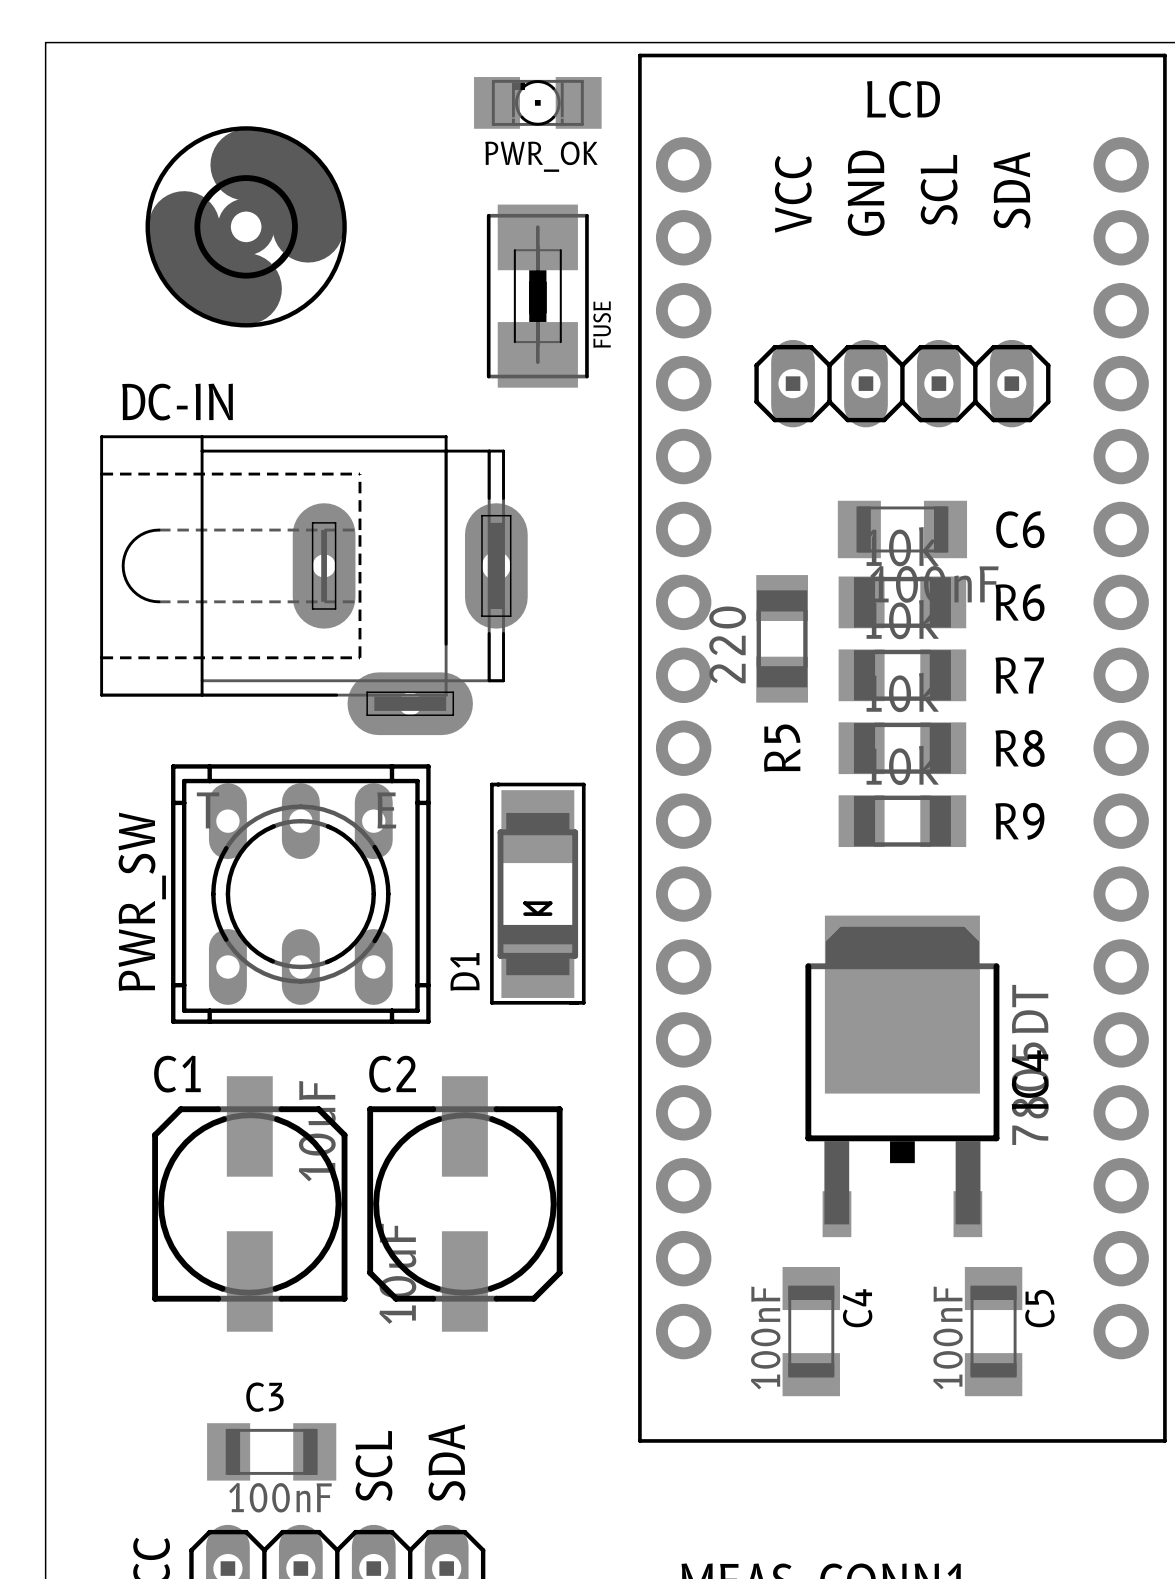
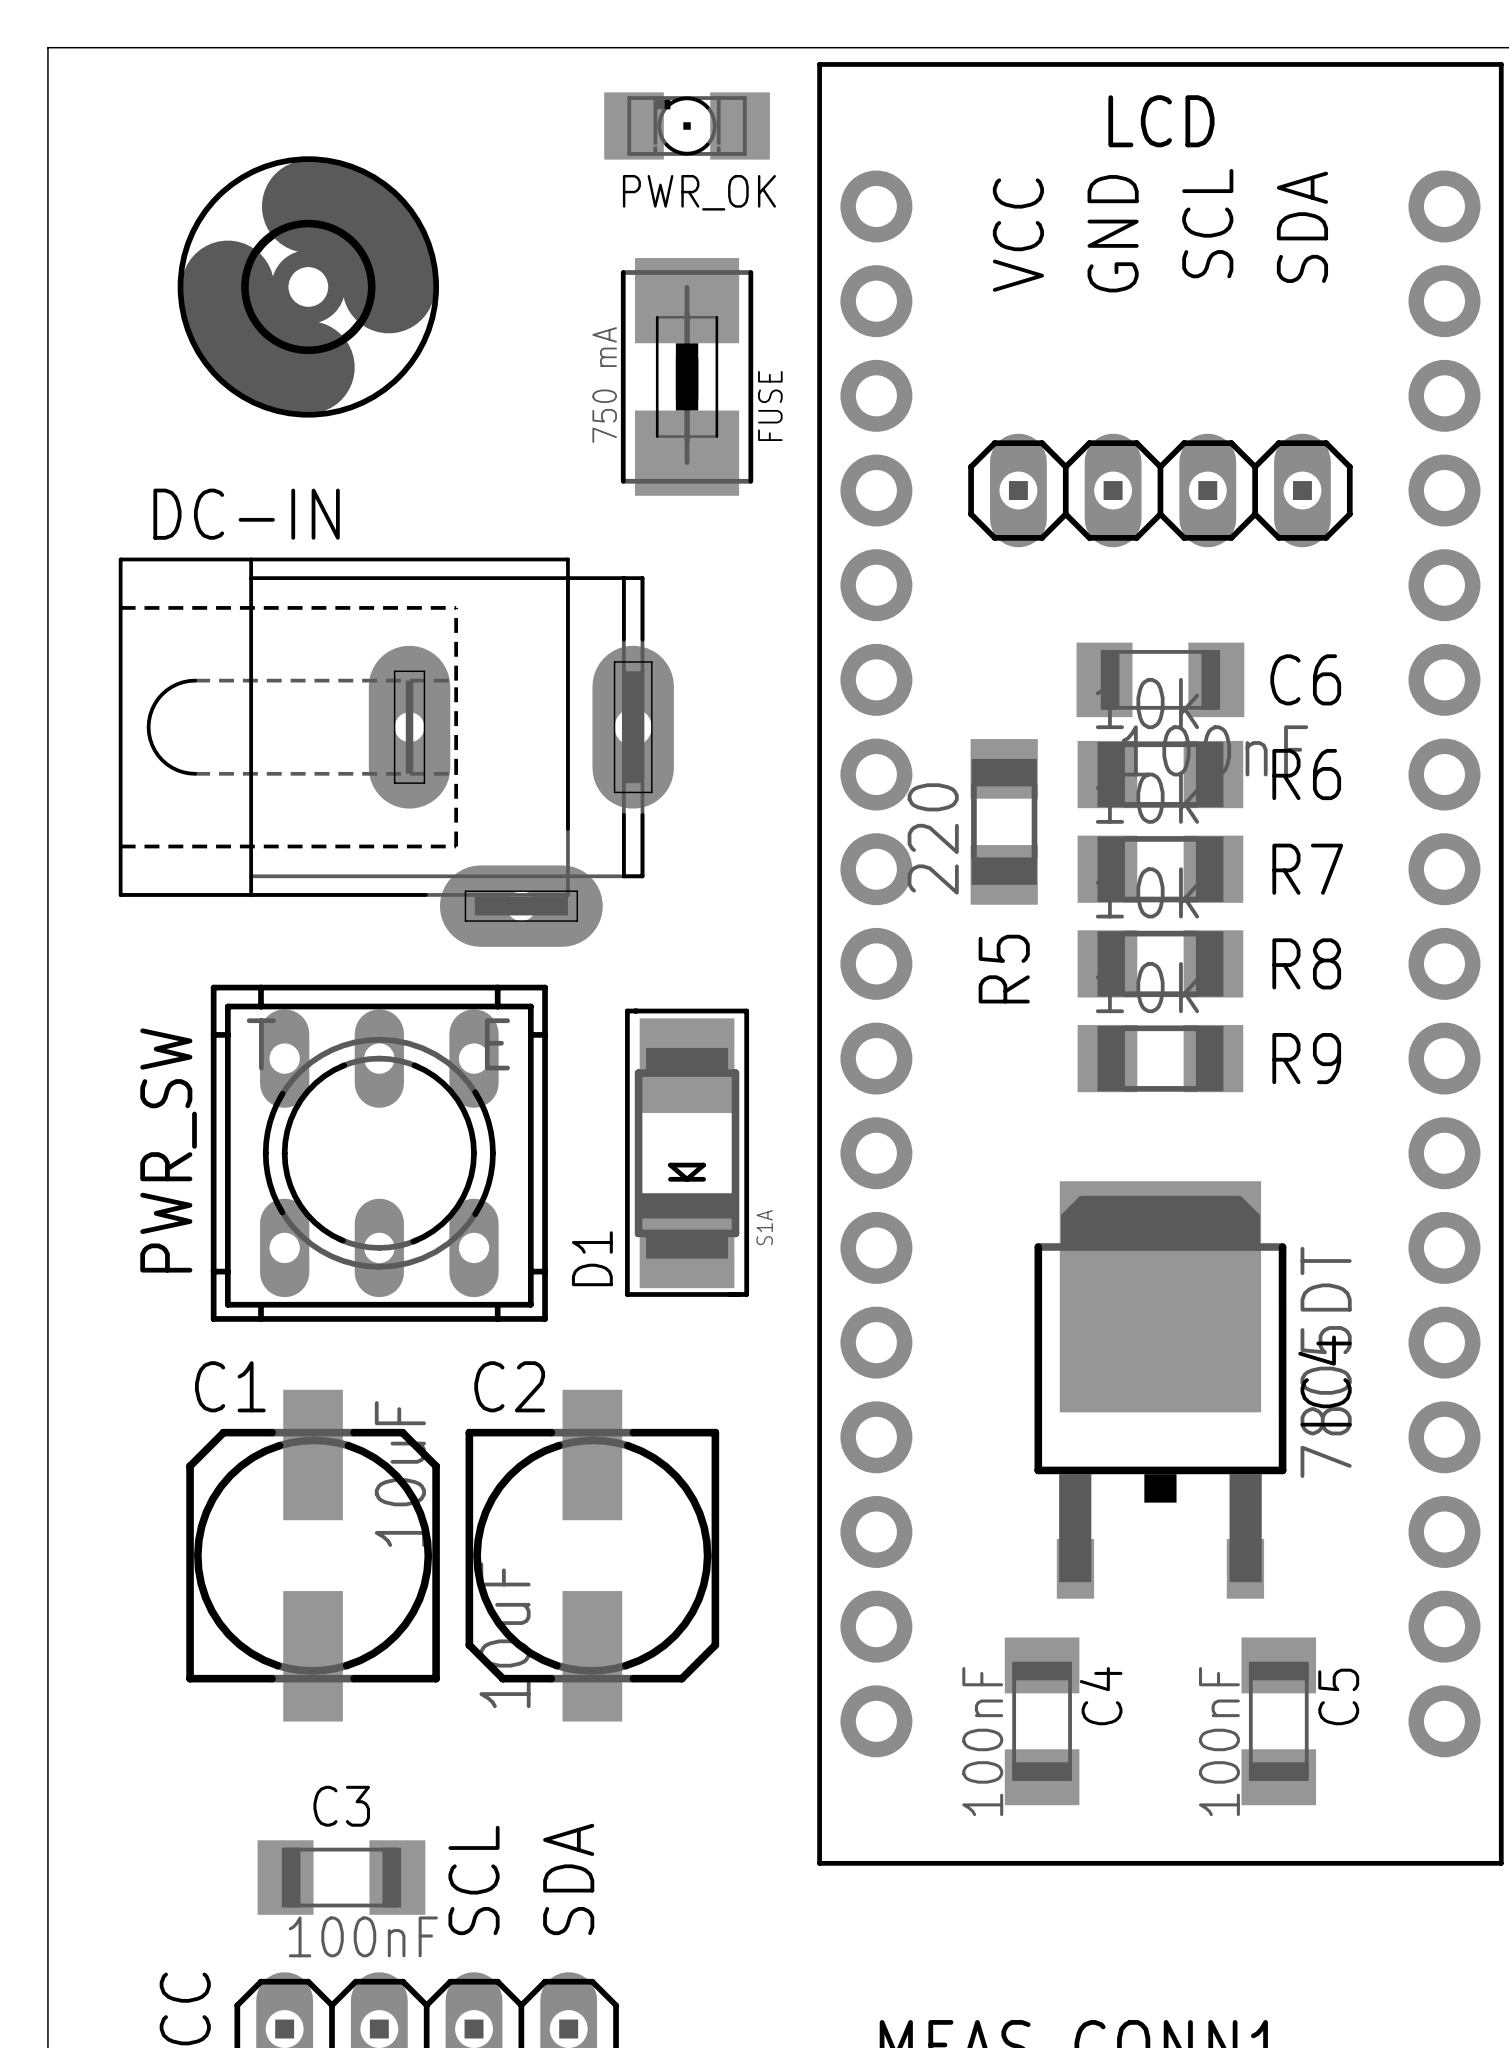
FUSE value: none -> 750 mA (604, 385)
D1 value: none -> S1A (764, 1227)

